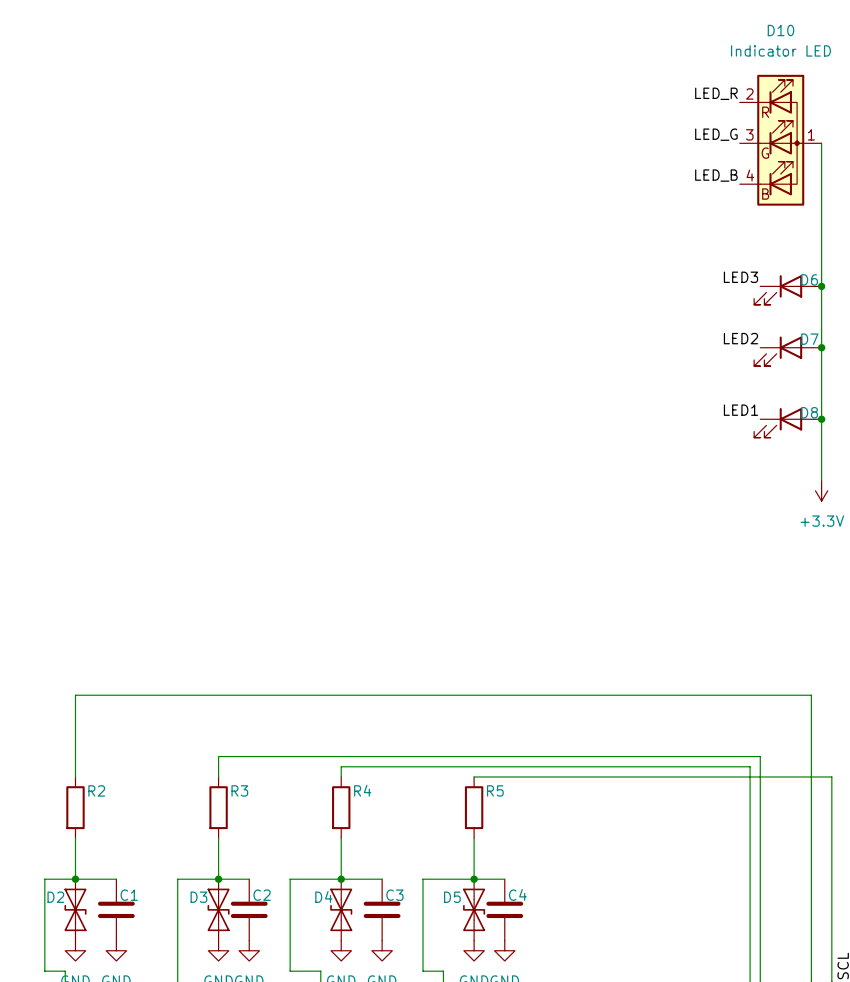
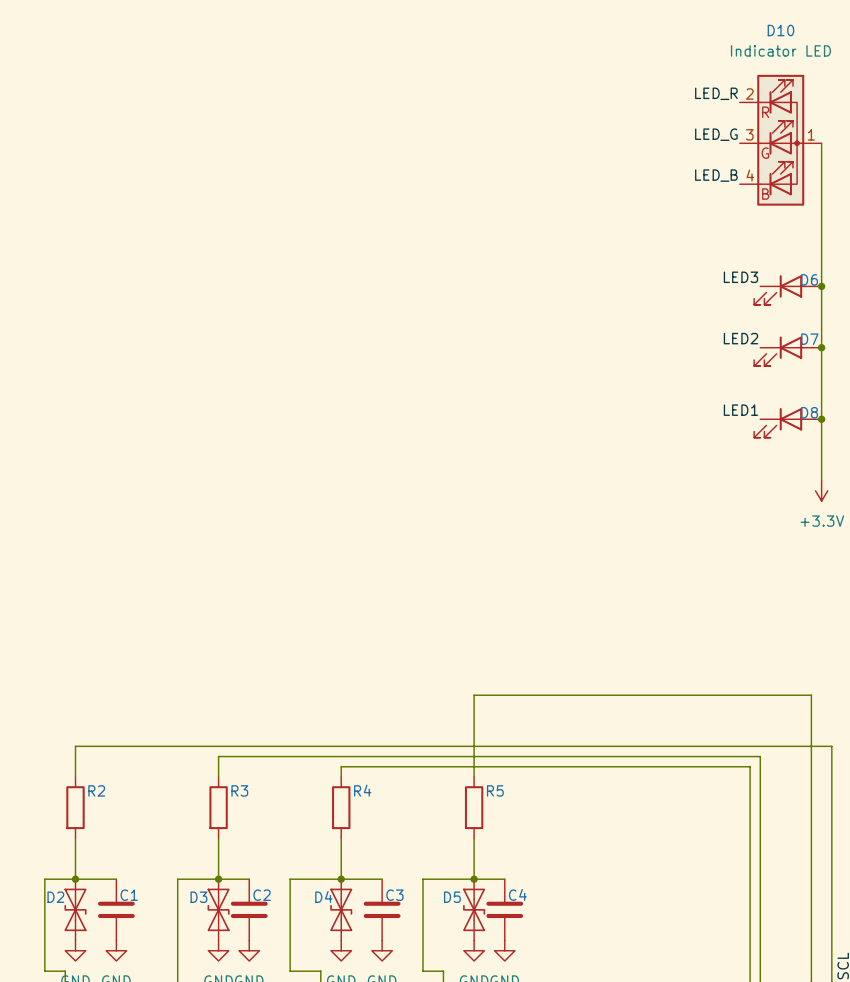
wire: (474, 695) (75, 695) (75, 746) -> (831, 777) (831, 746) (75, 746)
wire: (474, 777) (831, 777) -> (474, 777) (474, 695)

